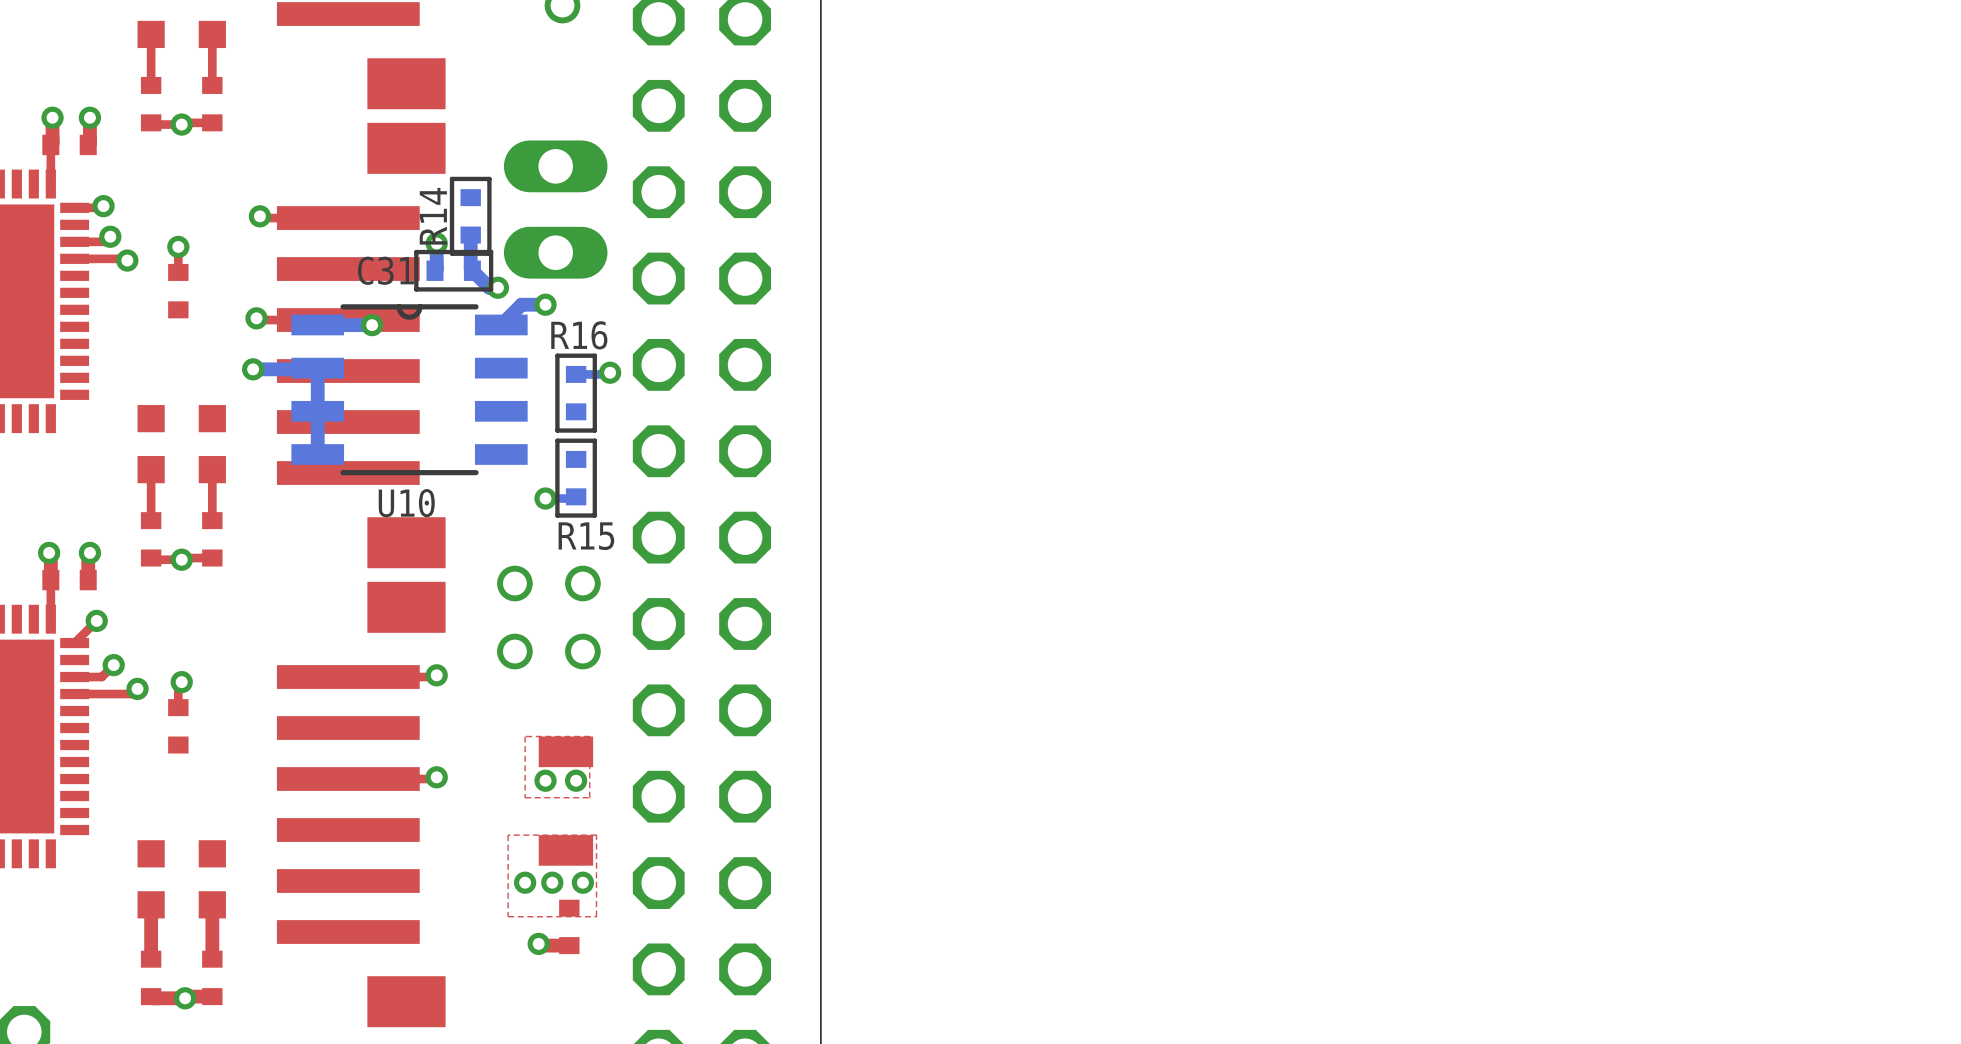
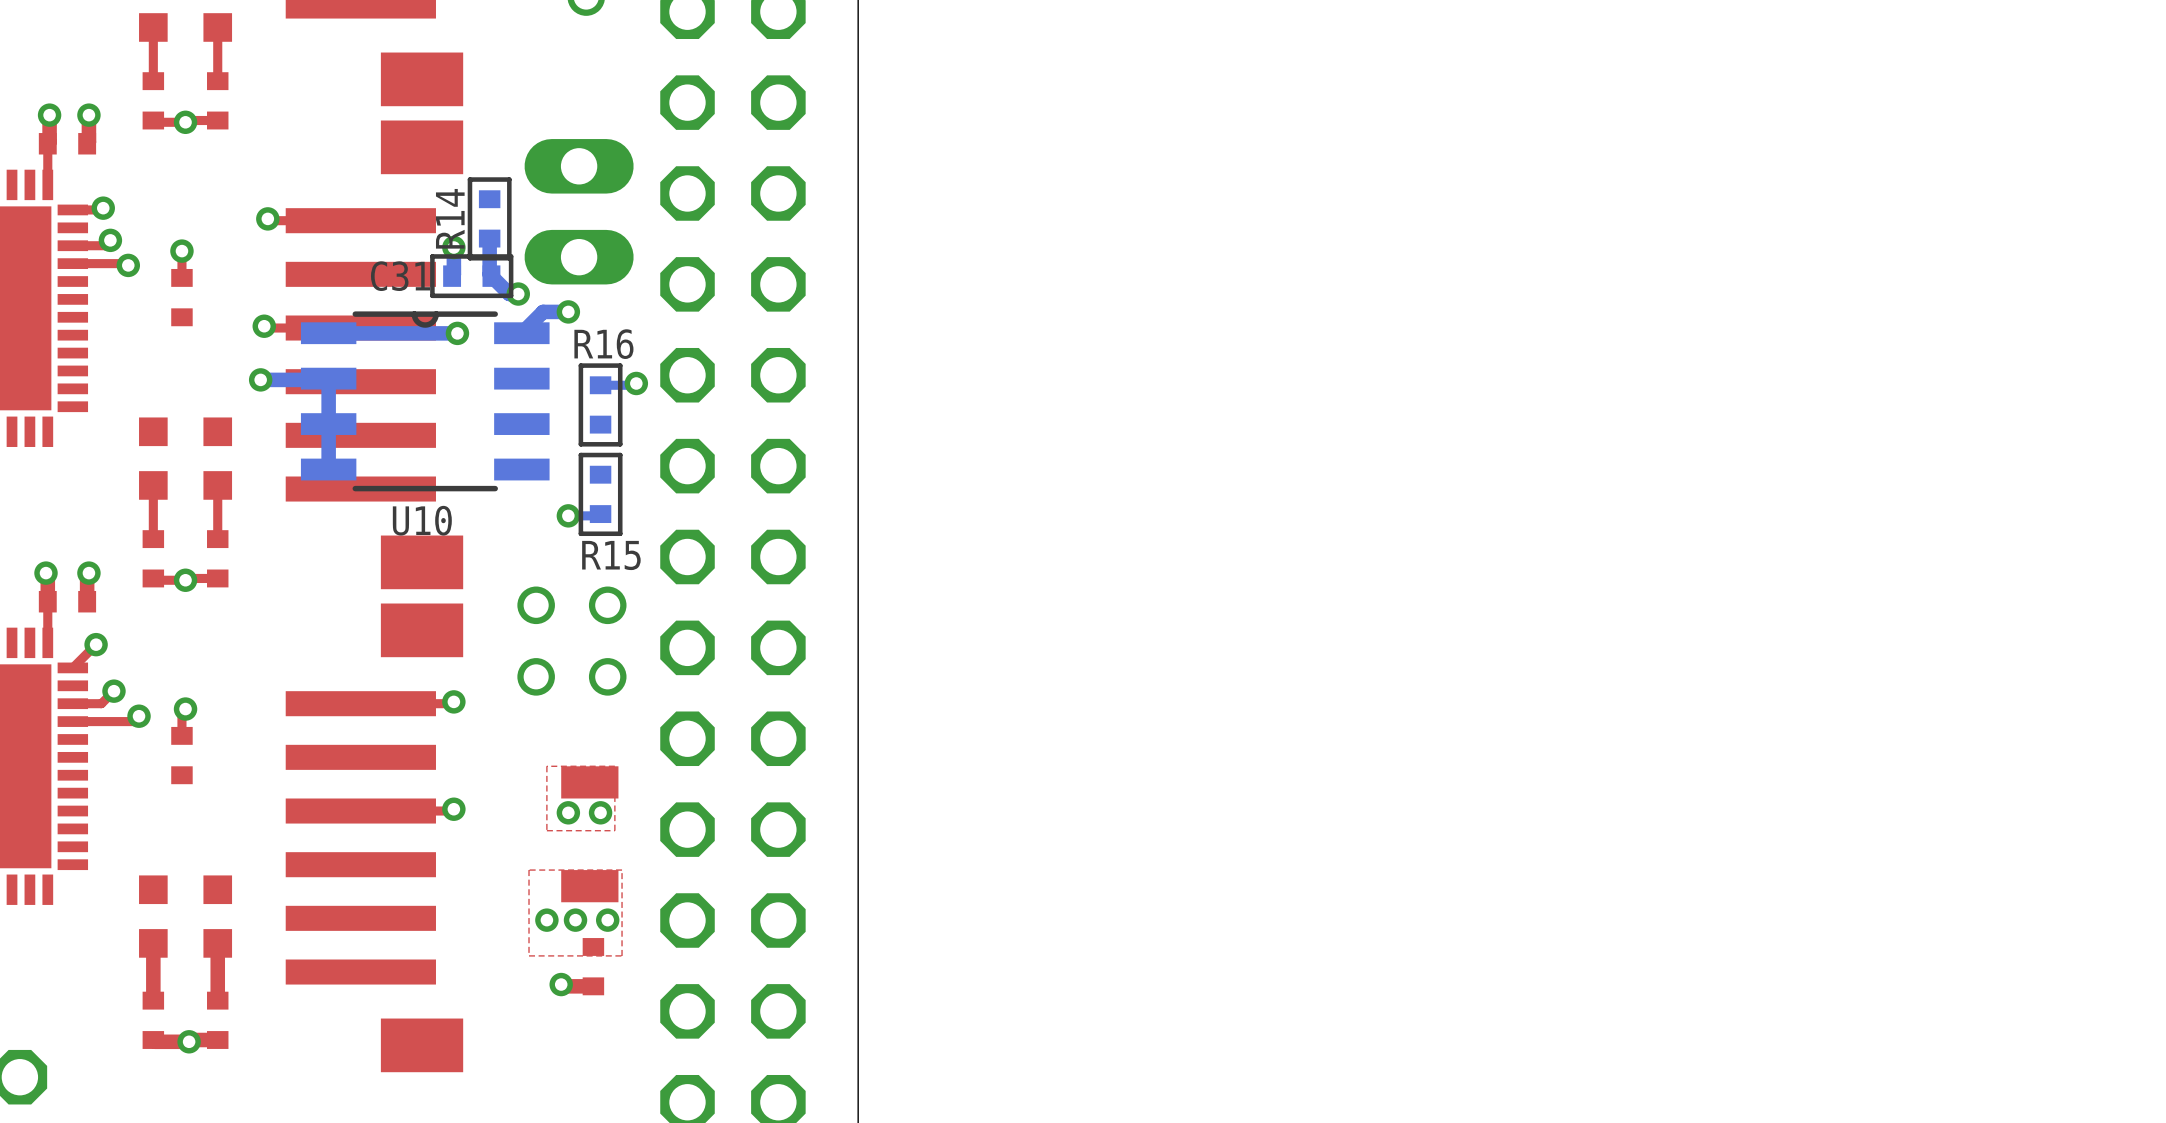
via position: (372, 325) -> (457, 333)
bottom track: none -> (457, 333) (385, 333)

